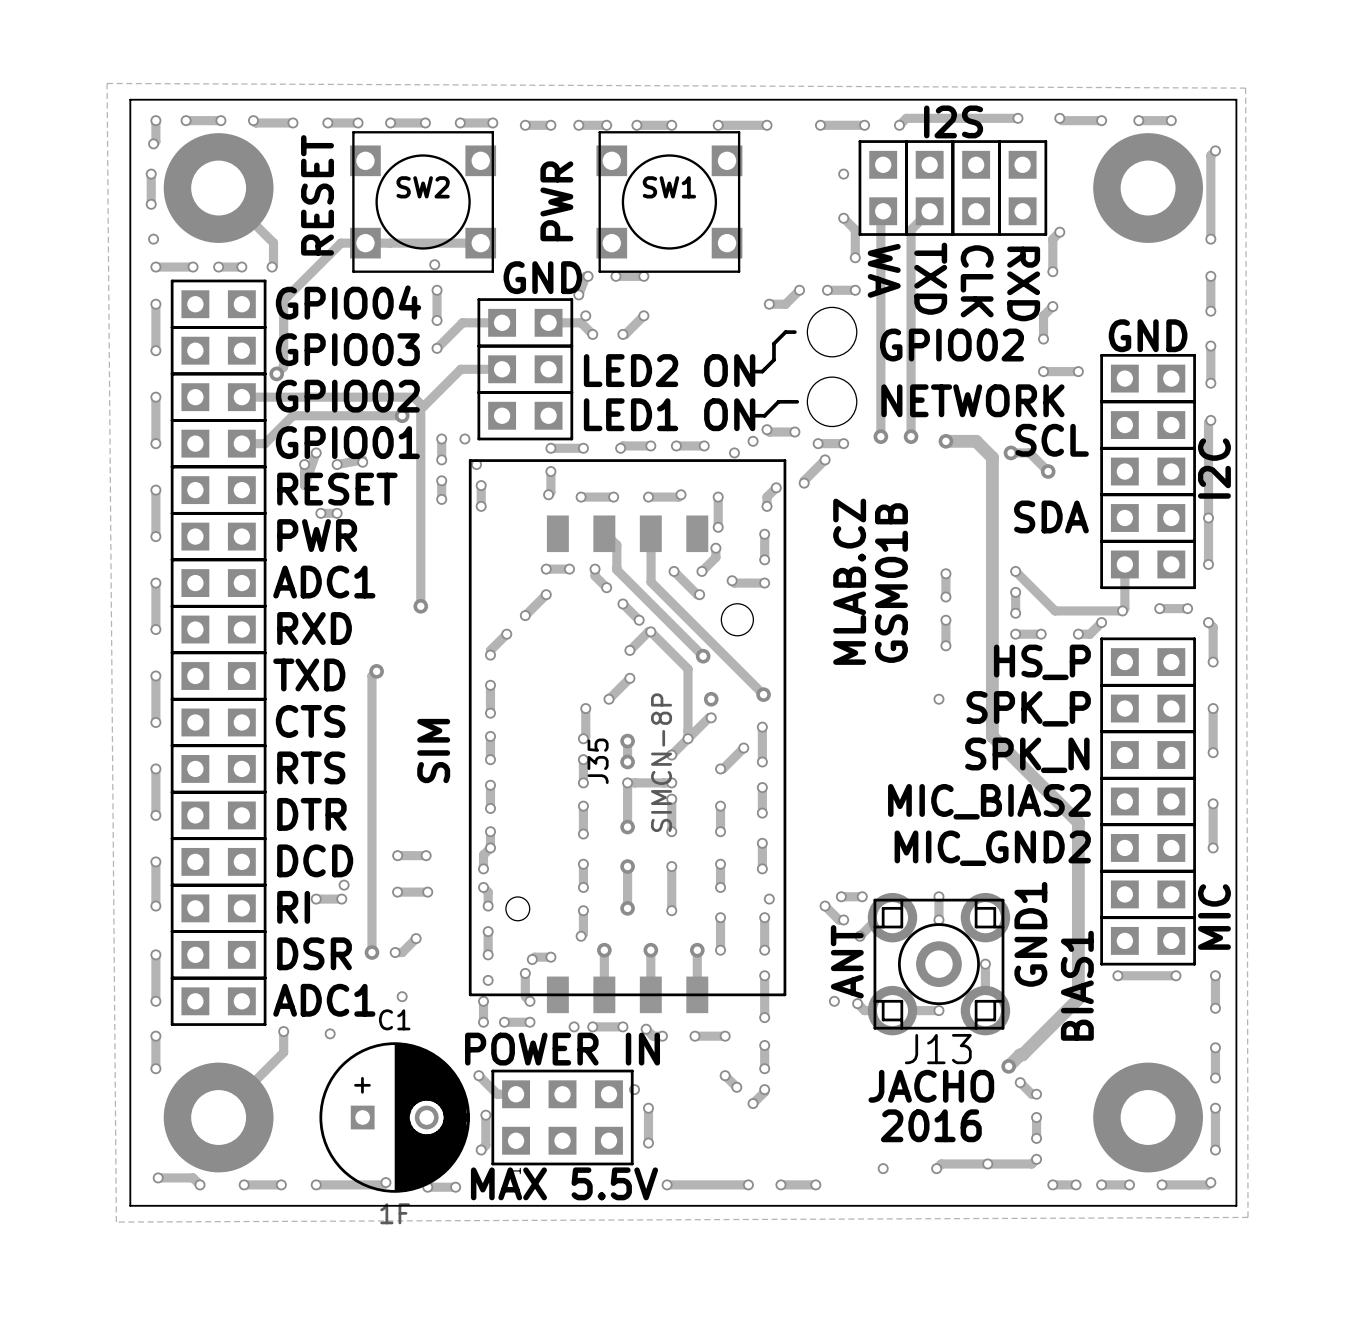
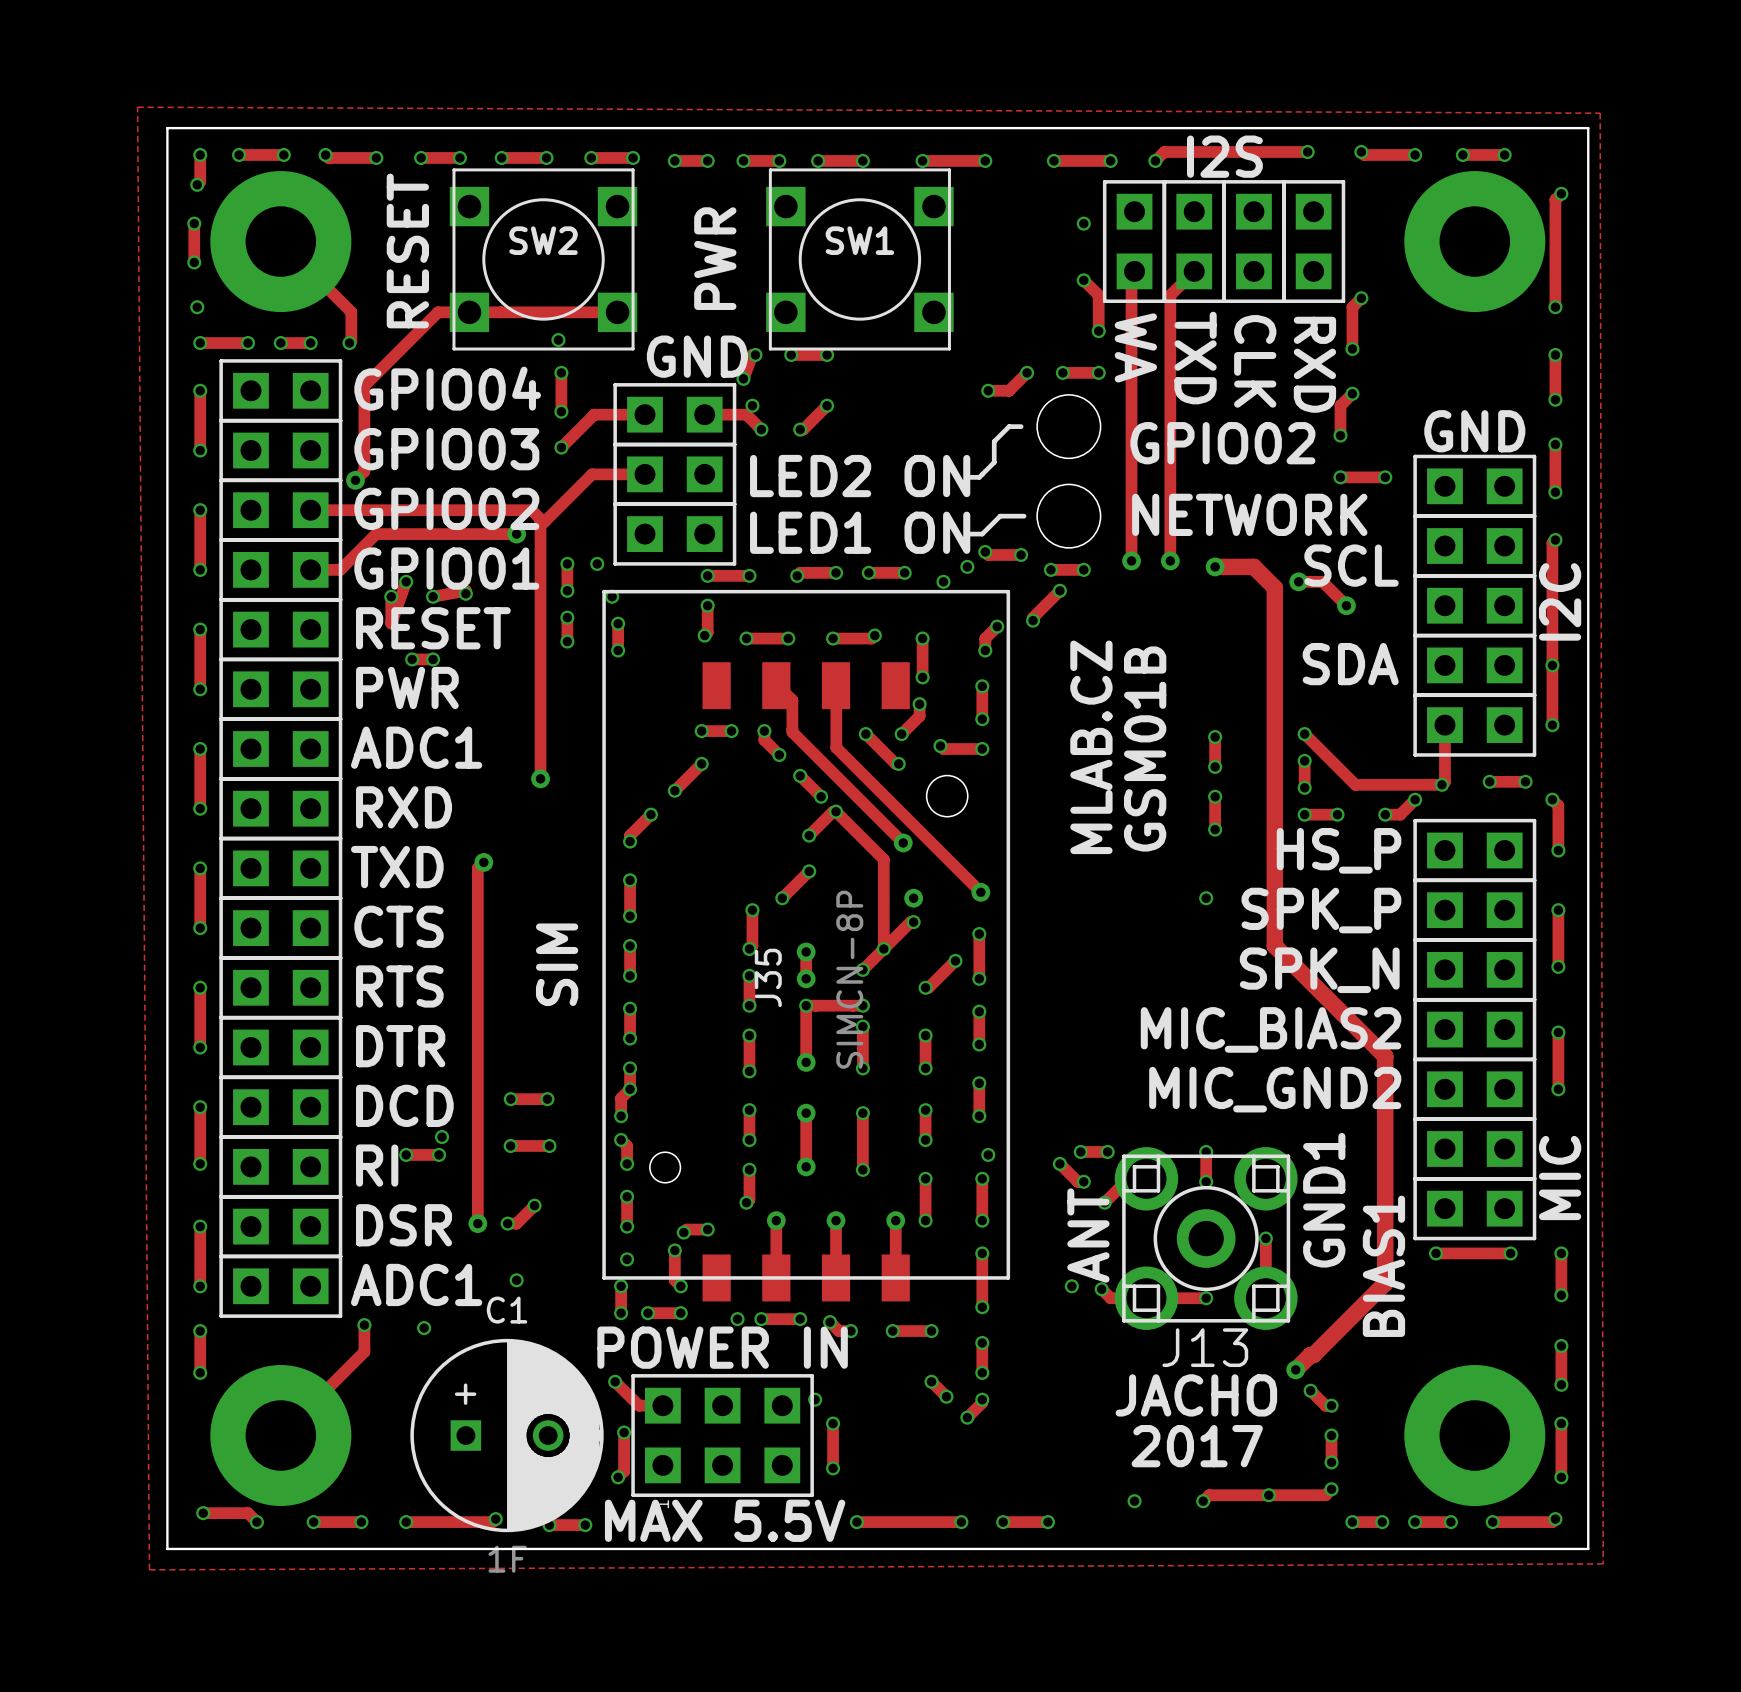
text: 2016 (931, 1125) -> 2017 (1197, 1446)

